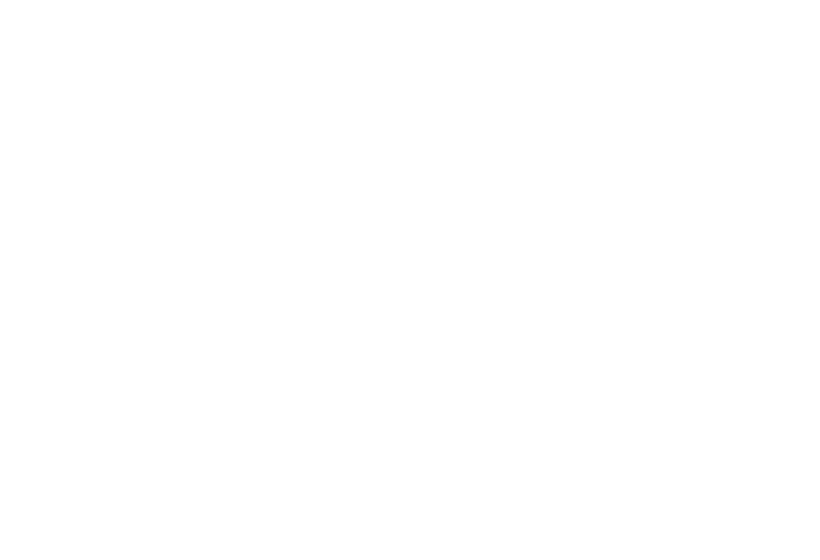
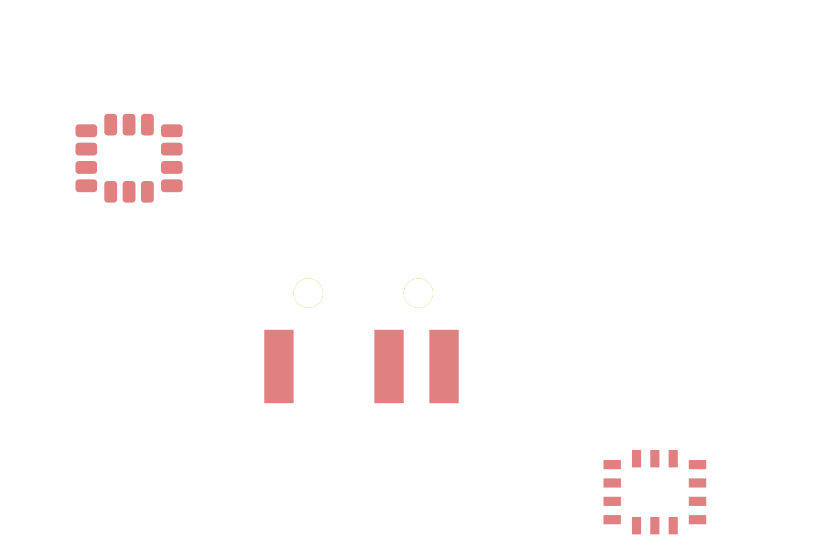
part: none -> (129, 158)
part: none -> (361, 340)
part: none -> (654, 492)

